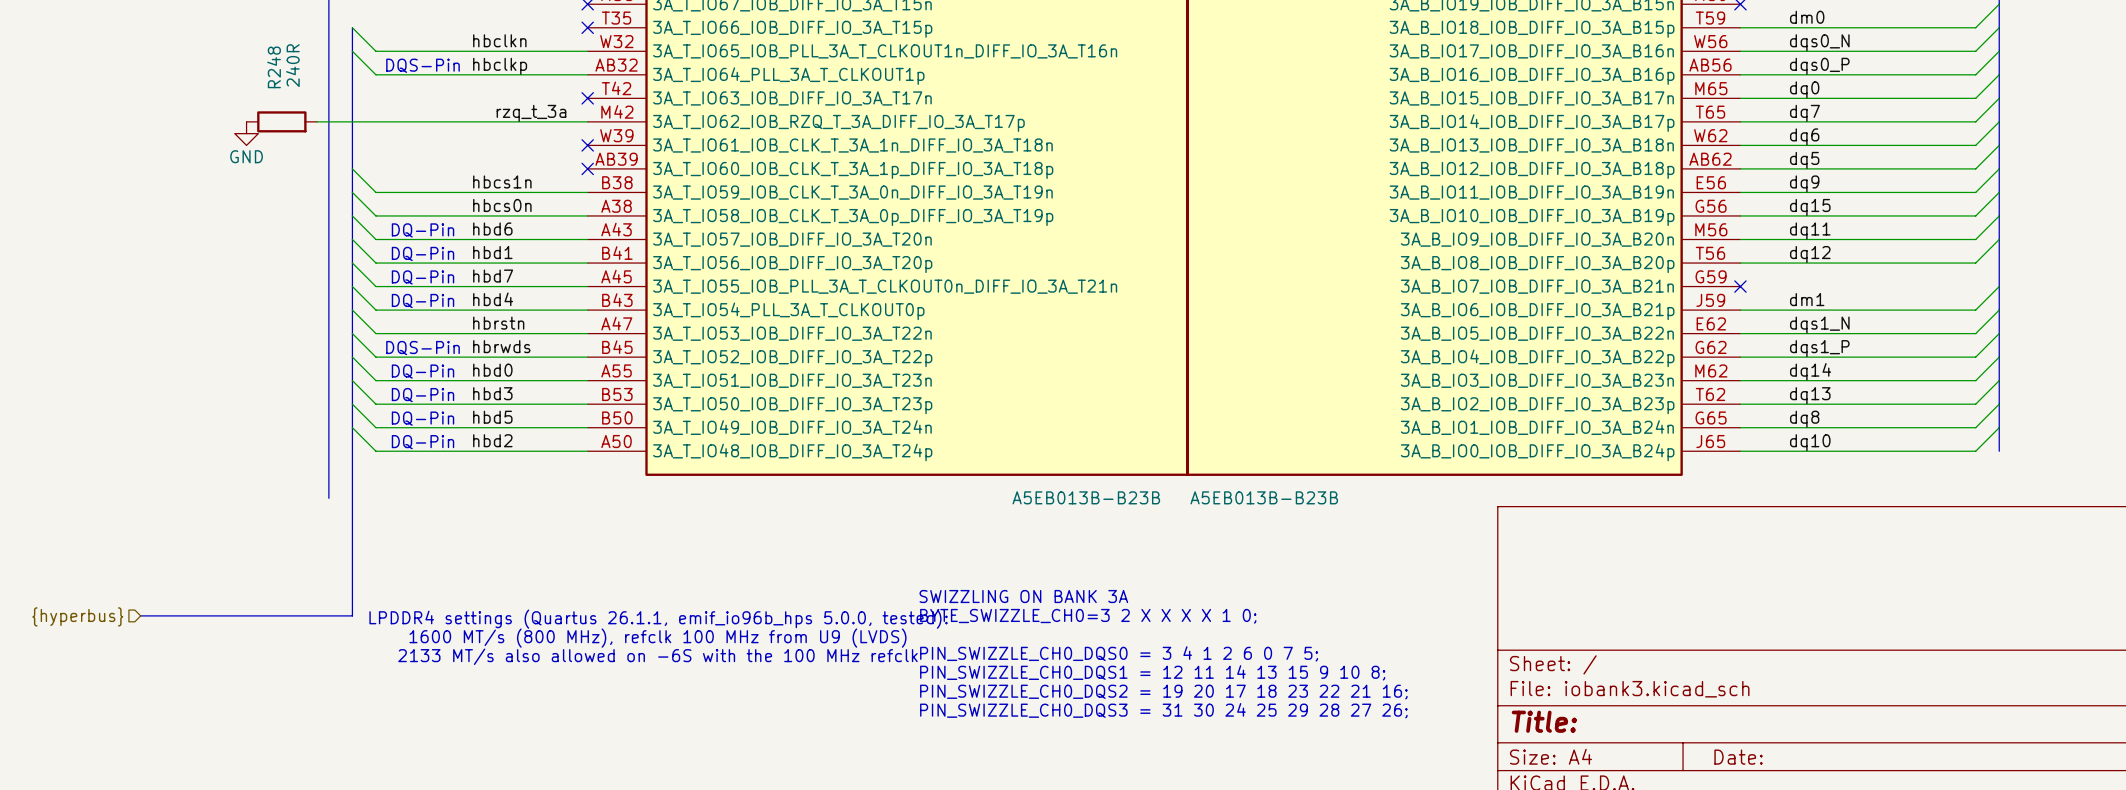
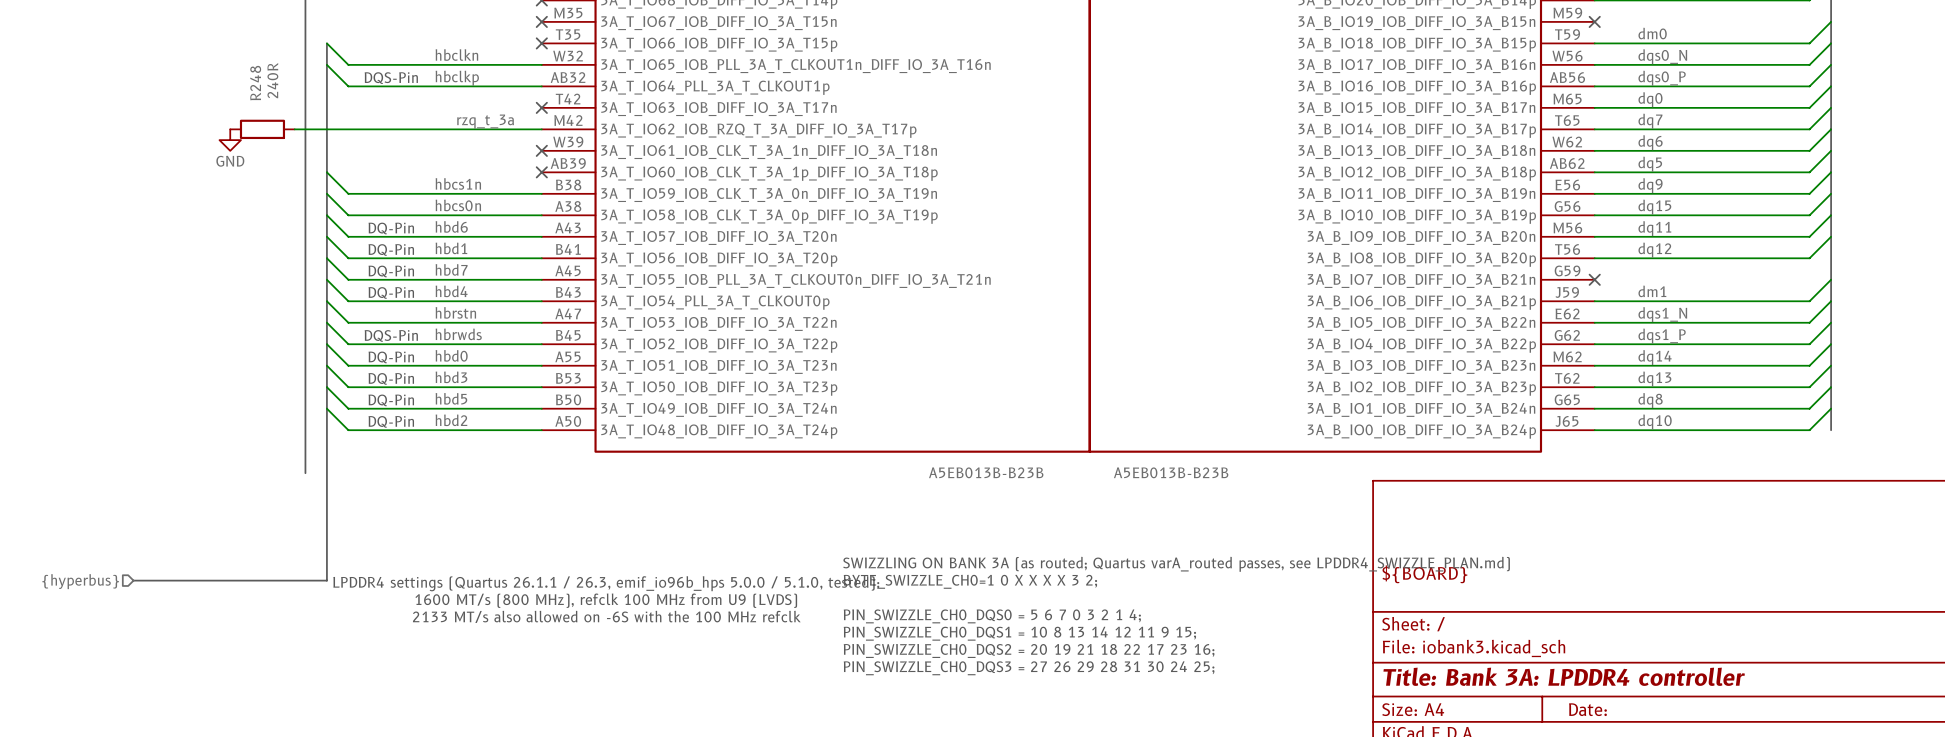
text: SWIZZLING ON BANK 3A (1023, 596) -> SWIZZLING ON BANK 3A (as routed; Quartus varA_routed passes, see LPDDR4_SWIZZLE_PLAN.md) (1176, 564)
title block: none -> ${BOARD} (1424, 574)
text: BYTE_SWIZZLE_CH0=3 2 X X X X 1 0; (1088, 616) -> BYTE_SWIZZLE_CH0=1 0 X X X X 3 2; (970, 581)
text: LPDDR4 settings (Quartus 26.1.1, emif_io96b_hps 5.0.0, tested): (658, 619) -> LPDDR4 settings (Quartus 26.1.1 / 26.3, emif_io96b_hps 5.0.0 / 5.1.0, tested): (606, 583)
text: PIN_SWIZZLE_CH0_DQS0 = 3 4 1 2 6 0 7 5; (1119, 653) -> PIN_SWIZZLE_CH0_DQS0 = 5 6 7 0 3 2 1 4; (992, 616)
text: PIN_SWIZZLE_CH0_DQS1 = 12 11 14 13 15 9 10 8; (1152, 672) -> PIN_SWIZZLE_CH0_DQS1 = 10 8 13 14 12 11 9 15; (1019, 633)
text: PIN_SWIZZLE_CH0_DQS2 = 19 20 17 18 23 22 21 16; (1163, 692) -> PIN_SWIZZLE_CH0_DQS2 = 20 19 21 18 22 17 23 16; (1029, 650)
text: PIN_SWIZZLE_CH0_DQS3 = 31 30 24 25 29 28 27 26; (1163, 710) -> PIN_SWIZZLE_CH0_DQS3 = 27 26 29 28 31 30 24 25; (1029, 668)
title block: Title: (1544, 721) -> Title: Bank 3A: LPDDR4 controller (1564, 676)

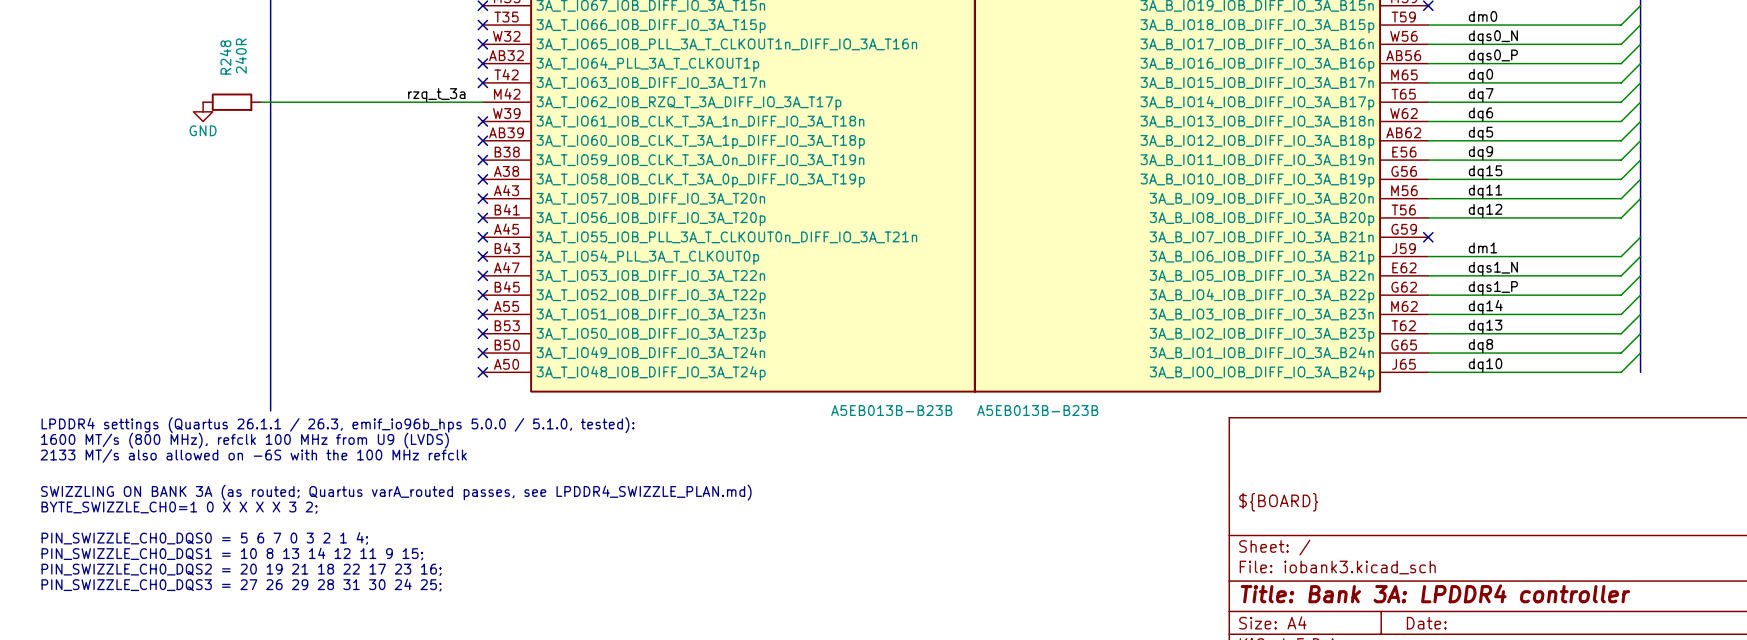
wire: (326, 43) (348, 64) (541, 64) -> none
bus: (326, 43) (326, 580) (133, 580) -> none
label: hbclkn (456, 55) -> none
wire: (326, 64) (348, 86) (541, 86) -> none
no-connect mark: none -> (482, 44)
text: DQS-Pin (391, 78) -> none
label: hbclkp (457, 78) -> none
no-connect mark: none -> (482, 63)
wire: (326, 172) (348, 193) (541, 193) -> none
label: hbcs1n (458, 183) -> none
wire: (326, 193) (348, 215) (541, 215) -> none
no-connect mark: none -> (482, 160)
label: hbcs0n (458, 205) -> none
wire: (326, 215) (348, 236) (541, 236) -> none
no-connect mark: none -> (482, 179)
label: hbd6 (451, 226) -> none
text: DQ-Pin (391, 228) -> none
wire: (326, 236) (348, 258) (541, 258) -> none
no-connect mark: none -> (482, 198)
label: hbd1 (451, 248) -> none
text: DQ-Pin (391, 250) -> none
wire: (326, 258) (348, 279) (541, 279) -> none
no-connect mark: none -> (482, 217)
label: hbd7 (451, 269) -> none
text: DQ-Pin (391, 271) -> none
wire: (326, 279) (348, 301) (541, 301) -> none
no-connect mark: none -> (482, 237)
label: hbd4 (451, 291) -> none
text: DQ-Pin (391, 292) -> none
wire: (326, 301) (348, 322) (541, 322) -> none
no-connect mark: none -> (482, 256)
label: hbrstn (455, 312) -> none
wire: (326, 322) (348, 344) (541, 344) -> none
no-connect mark: none -> (482, 275)
label: hbrwds (458, 334) -> none
text: DQS-Pin (391, 335) -> none
wire: (326, 344) (348, 365) (541, 365) -> none
no-connect mark: none -> (482, 295)
label: hbd0 (451, 355) -> none
text: DQ-Pin (391, 357) -> none
wire: (326, 365) (348, 387) (541, 387) -> none
no-connect mark: none -> (482, 314)
label: hbd3 (451, 377) -> none
text: DQ-Pin (391, 378) -> none
wire: (326, 387) (348, 408) (541, 408) -> none
no-connect mark: none -> (482, 333)
label: hbd5 (451, 398) -> none
text: DQ-Pin (391, 400) -> none
wire: (326, 408) (348, 430) (541, 430) -> none
no-connect mark: none -> (482, 353)
label: hbd2 (451, 420) -> none
text: DQ-Pin (391, 421) -> none
no-connect mark: none -> (482, 372)
text: none -> LPDDR4 settings (Quartus 26.1.1 / 26.3, emif_io96b_hps 5.0.0 / 5.1.0, tested): (338, 425)
text: none -> 1600 MT/s (800 MHz), refclk 100 MHz from U9 (LVDS) (244, 440)
text: none -> 2133 MT/s also allowed on -6S with the 100 MHz refclk (253, 455)
text: none -> SWIZZLING ON BANK 3A (as routed; Quartus varA_routed passes, see LPDDR4_SWIZZLE_PLAN.md) (396, 492)
text: SWIZZLING ON BANK 3A (as routed; Quartus varA_routed passes, see LPDDR4_SWIZZLE_PLAN.md) (1176, 564) -> none
hierarchical label: {hyperbus} (80, 581) -> none
text: none -> BYTE_SWIZZLE_CH0=1 0 X X X X 3 2; (179, 507)
text: BYTE_SWIZZLE_CH0=1 0 X X X X 3 2; (970, 581) -> none
text: LPDDR4 settings (Quartus 26.1.1 / 26.3, emif_io96b_hps 5.0.0 / 5.1.0, tested): (606, 583) -> none
text: 1600 MT/s (800 MHz), refclk 100 MHz from U9 (LVDS) (606, 600) -> none
text: none -> PIN_SWIZZLE_CH0_DQS0 = 5 6 7 0 3 2 1 4; (204, 538)
text: 2133 MT/s also allowed on -6S with the 100 MHz refclk (606, 616) -> none
text: PIN_SWIZZLE_CH0_DQS0 = 5 6 7 0 3 2 1 4; (992, 616) -> none
text: none -> PIN_SWIZZLE_CH0_DQS1 = 10 8 13 14 12 11 9 15; (232, 554)
text: PIN_SWIZZLE_CH0_DQS1 = 10 8 13 14 12 11 9 15; (1019, 633) -> none
text: none -> PIN_SWIZZLE_CH0_DQS2 = 20 19 21 18 22 17 23 16; (241, 569)
text: PIN_SWIZZLE_CH0_DQS2 = 20 19 21 18 22 17 23 16; (1029, 650) -> none
text: none -> PIN_SWIZZLE_CH0_DQS3 = 27 26 29 28 31 30 24 25; (241, 585)
text: PIN_SWIZZLE_CH0_DQS3 = 27 26 29 28 31 30 24 25; (1029, 668) -> none

